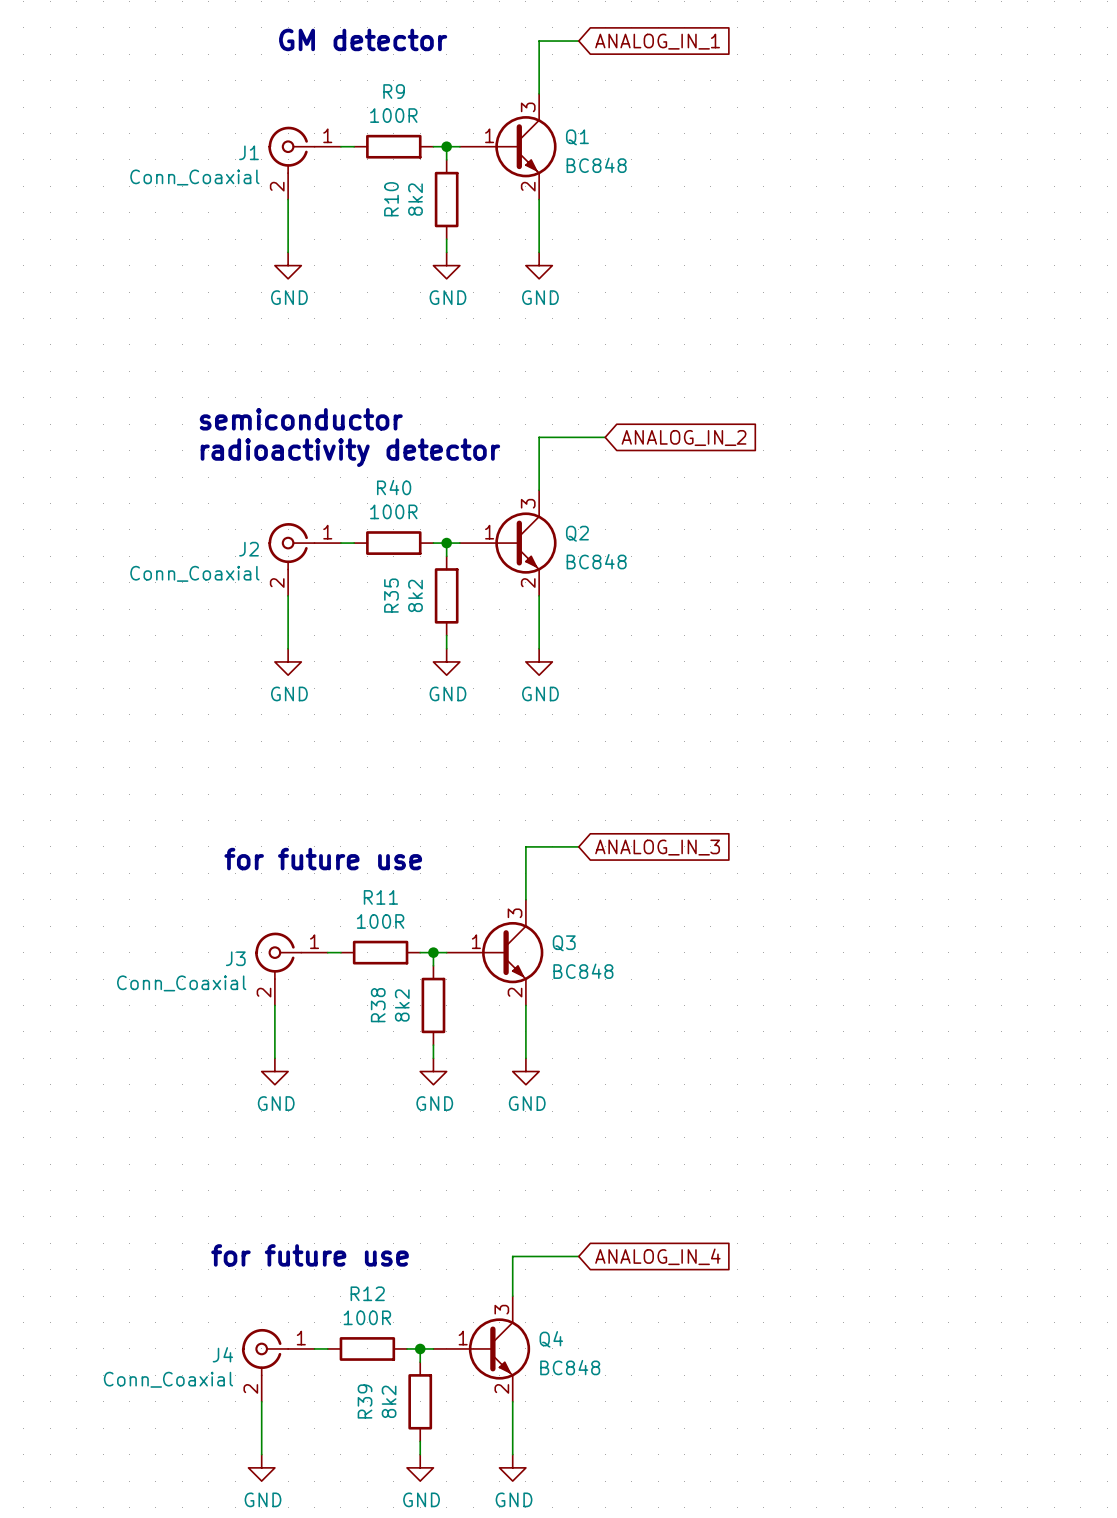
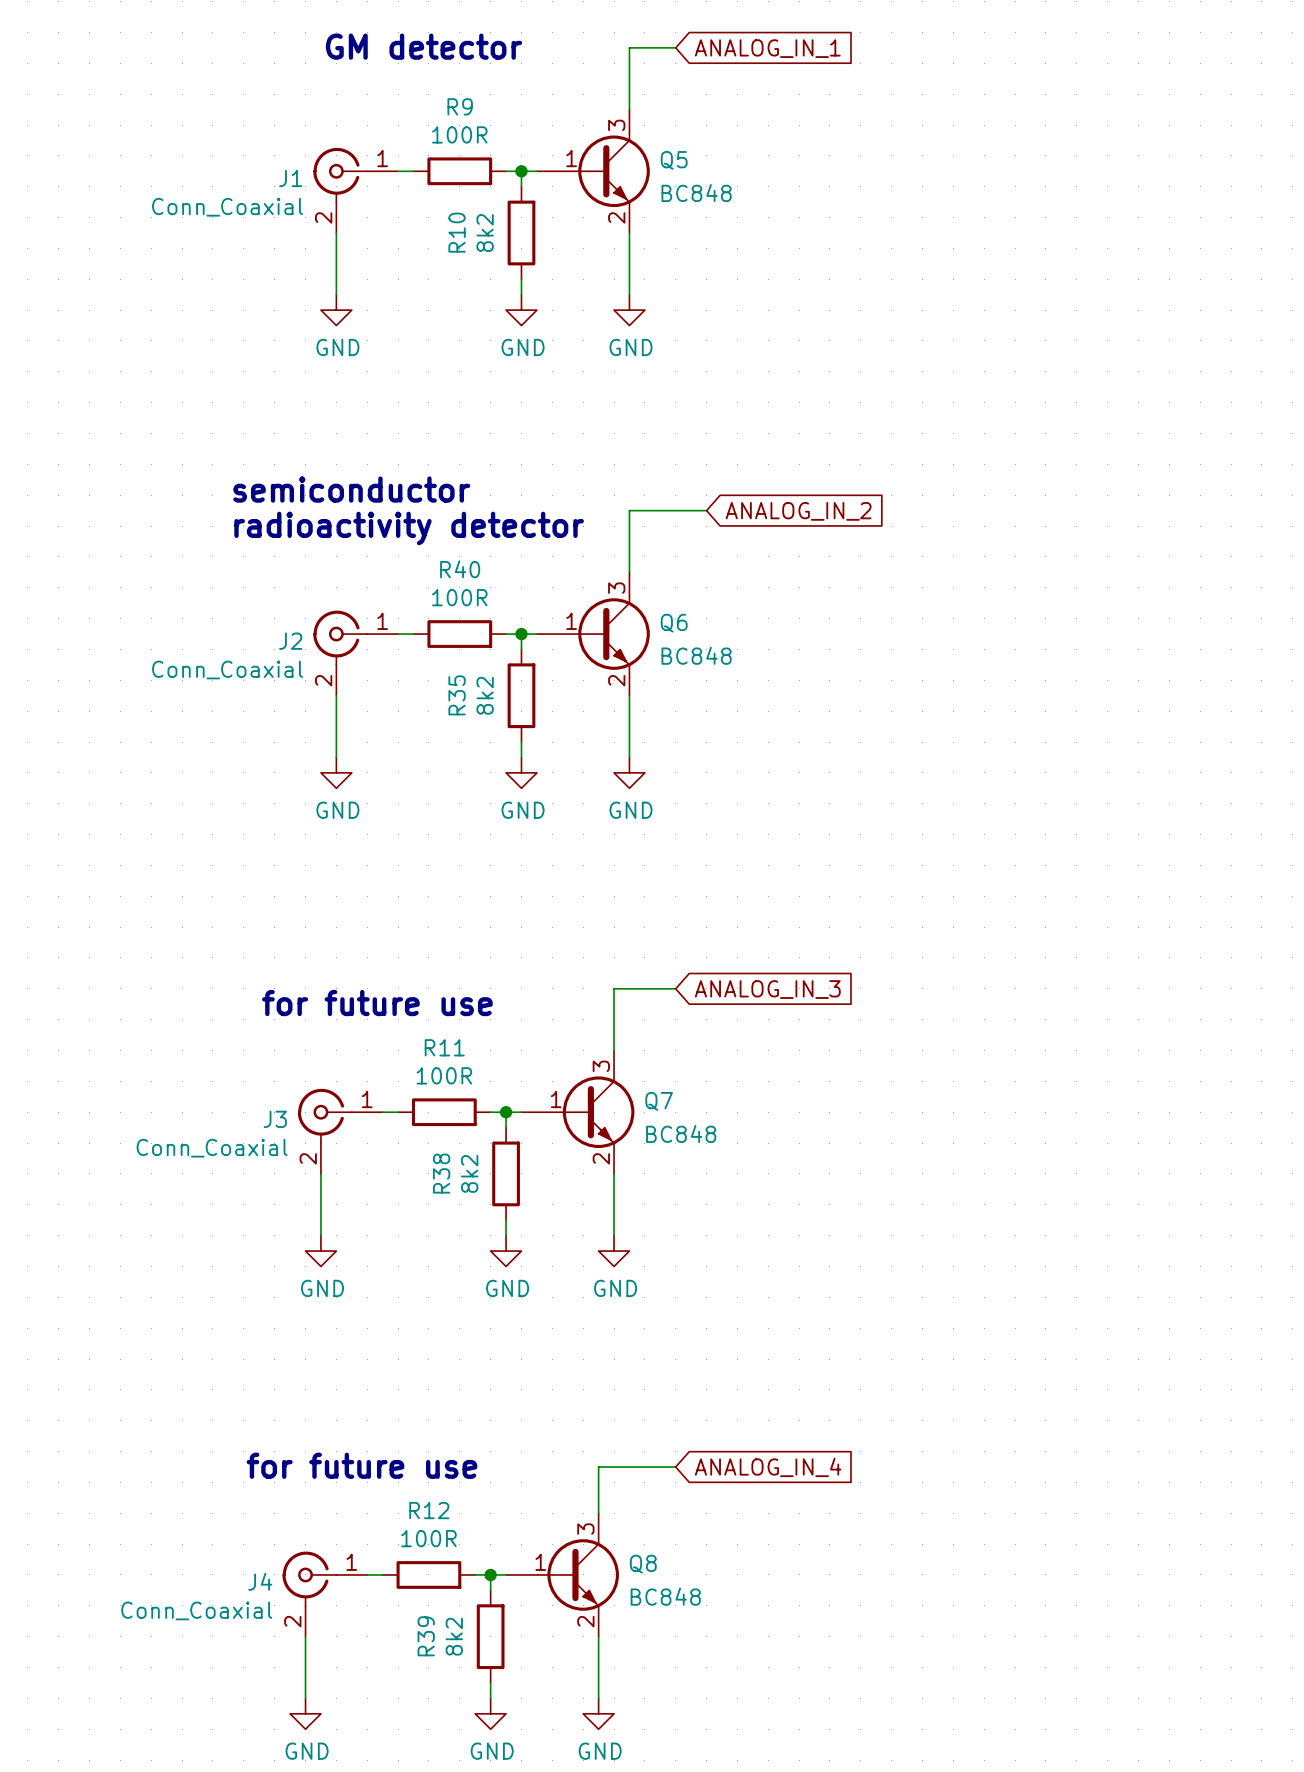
Q1 name: Q1 (577, 137) -> Q5 (674, 160)
Q2 name: Q2 (577, 533) -> Q6 (674, 623)
Q3 name: Q3 (564, 943) -> Q7 (659, 1101)
Q4 name: Q4 (551, 1339) -> Q8 (643, 1564)

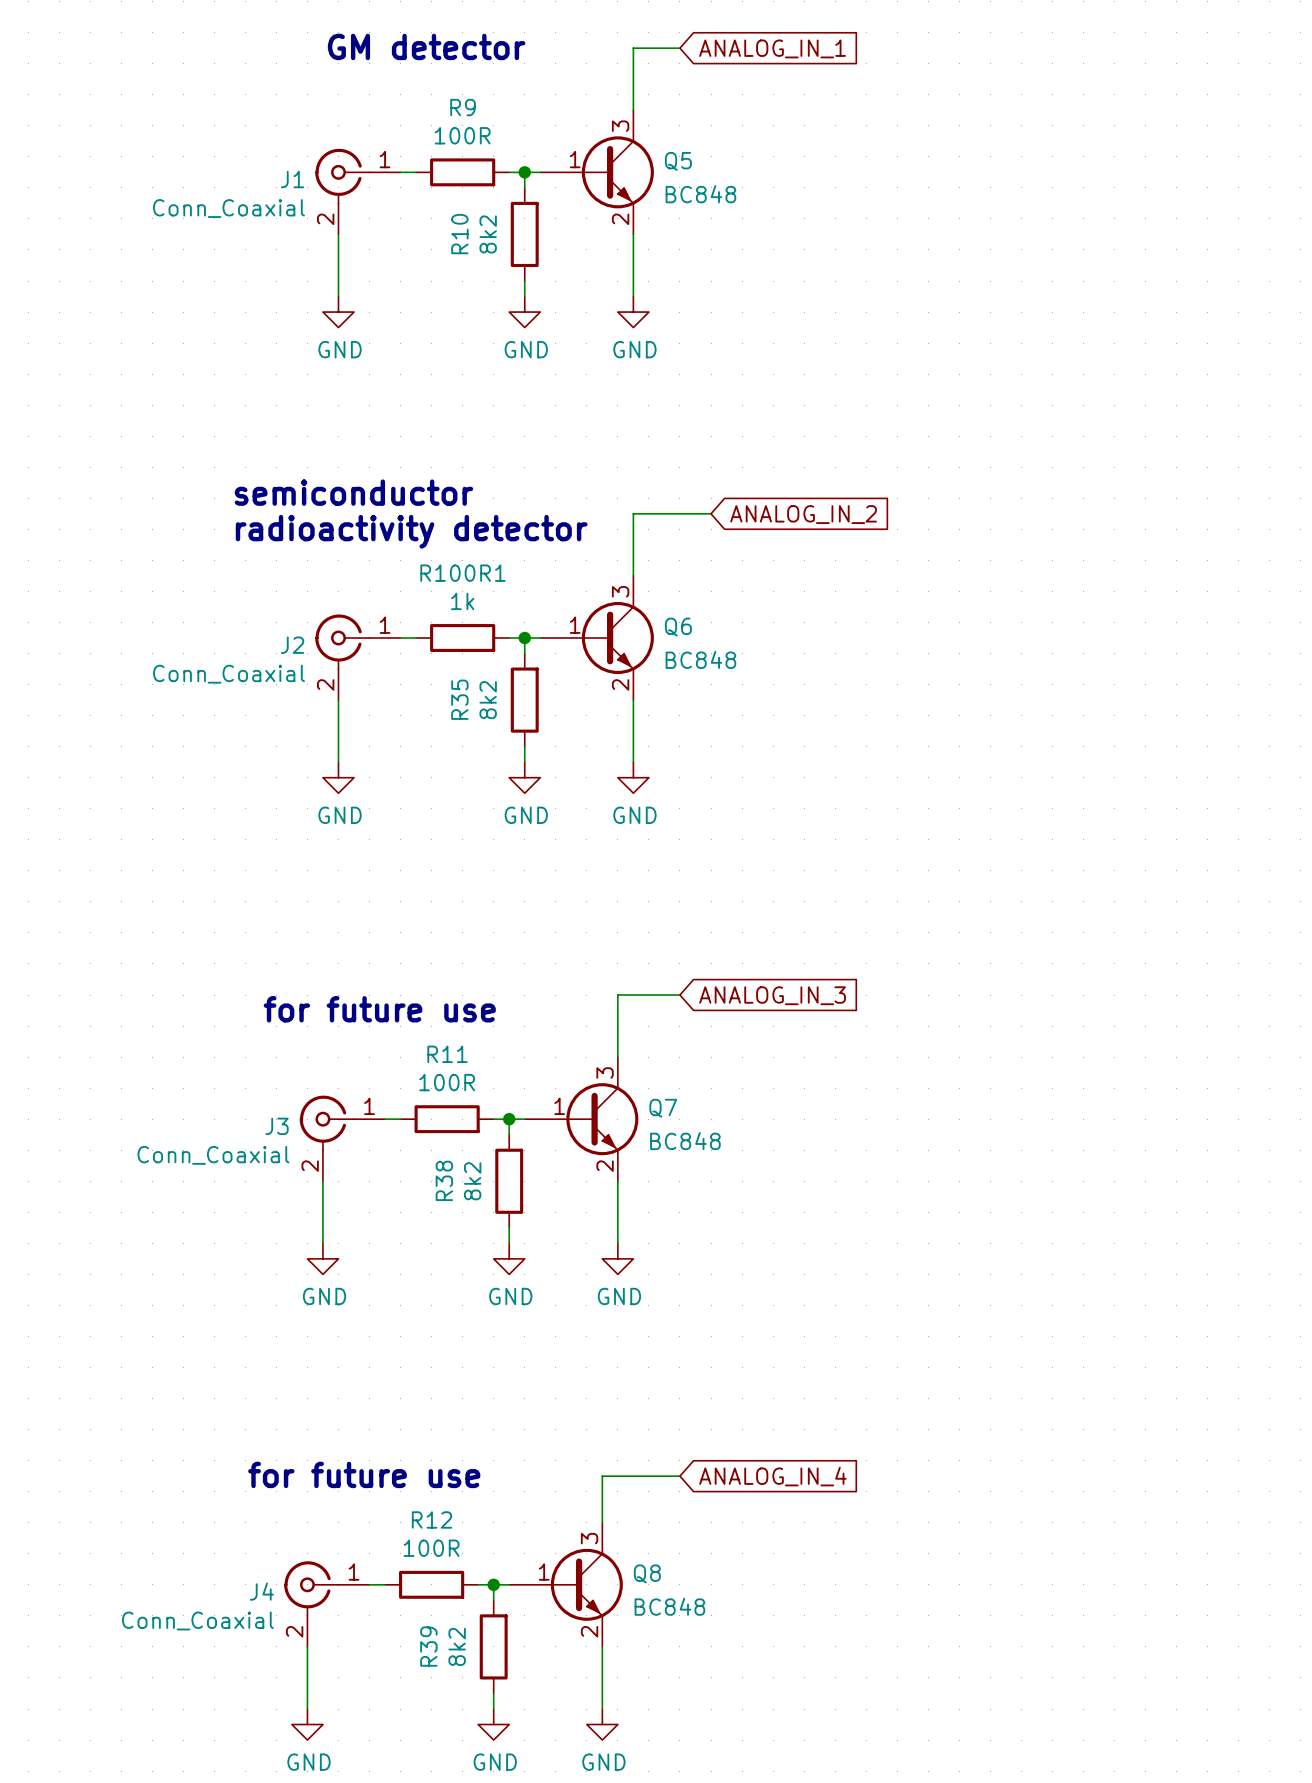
R40 name: R40 (460, 569) -> R100R1 (463, 573)
R40 value: 100R (459, 597) -> 1k (462, 601)

